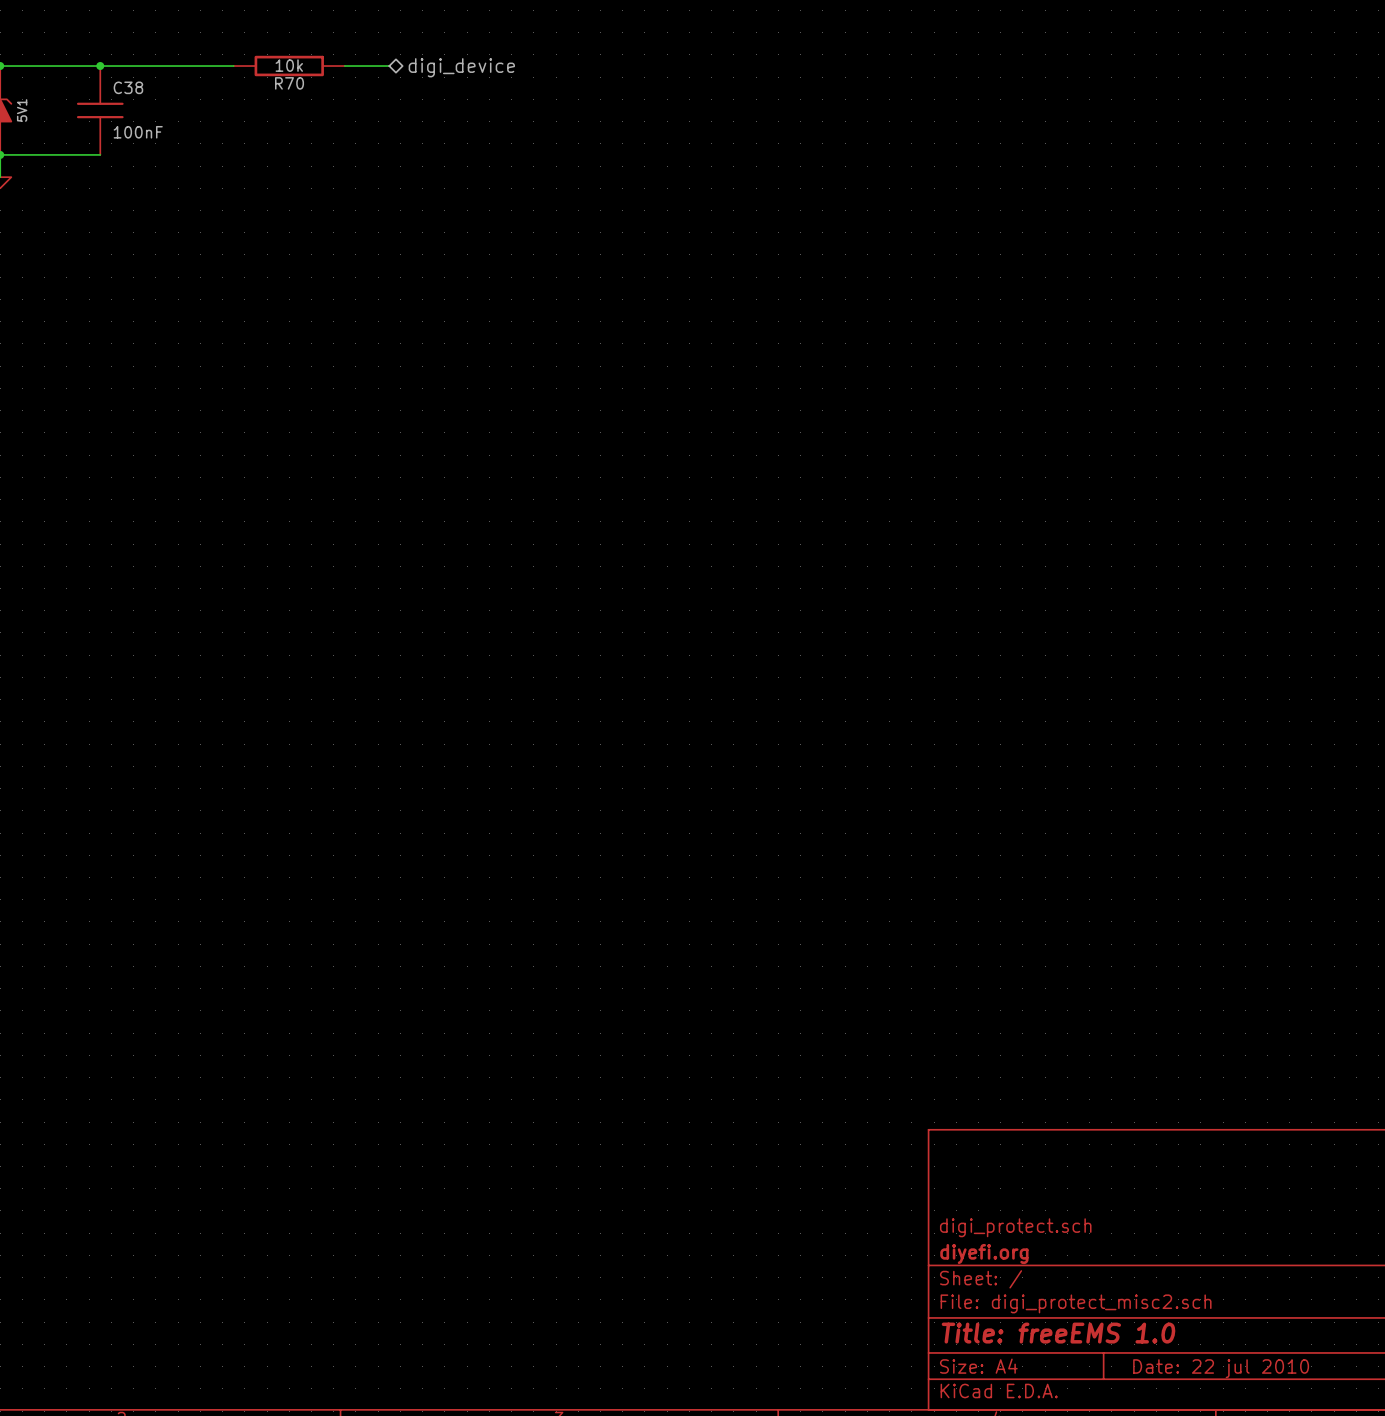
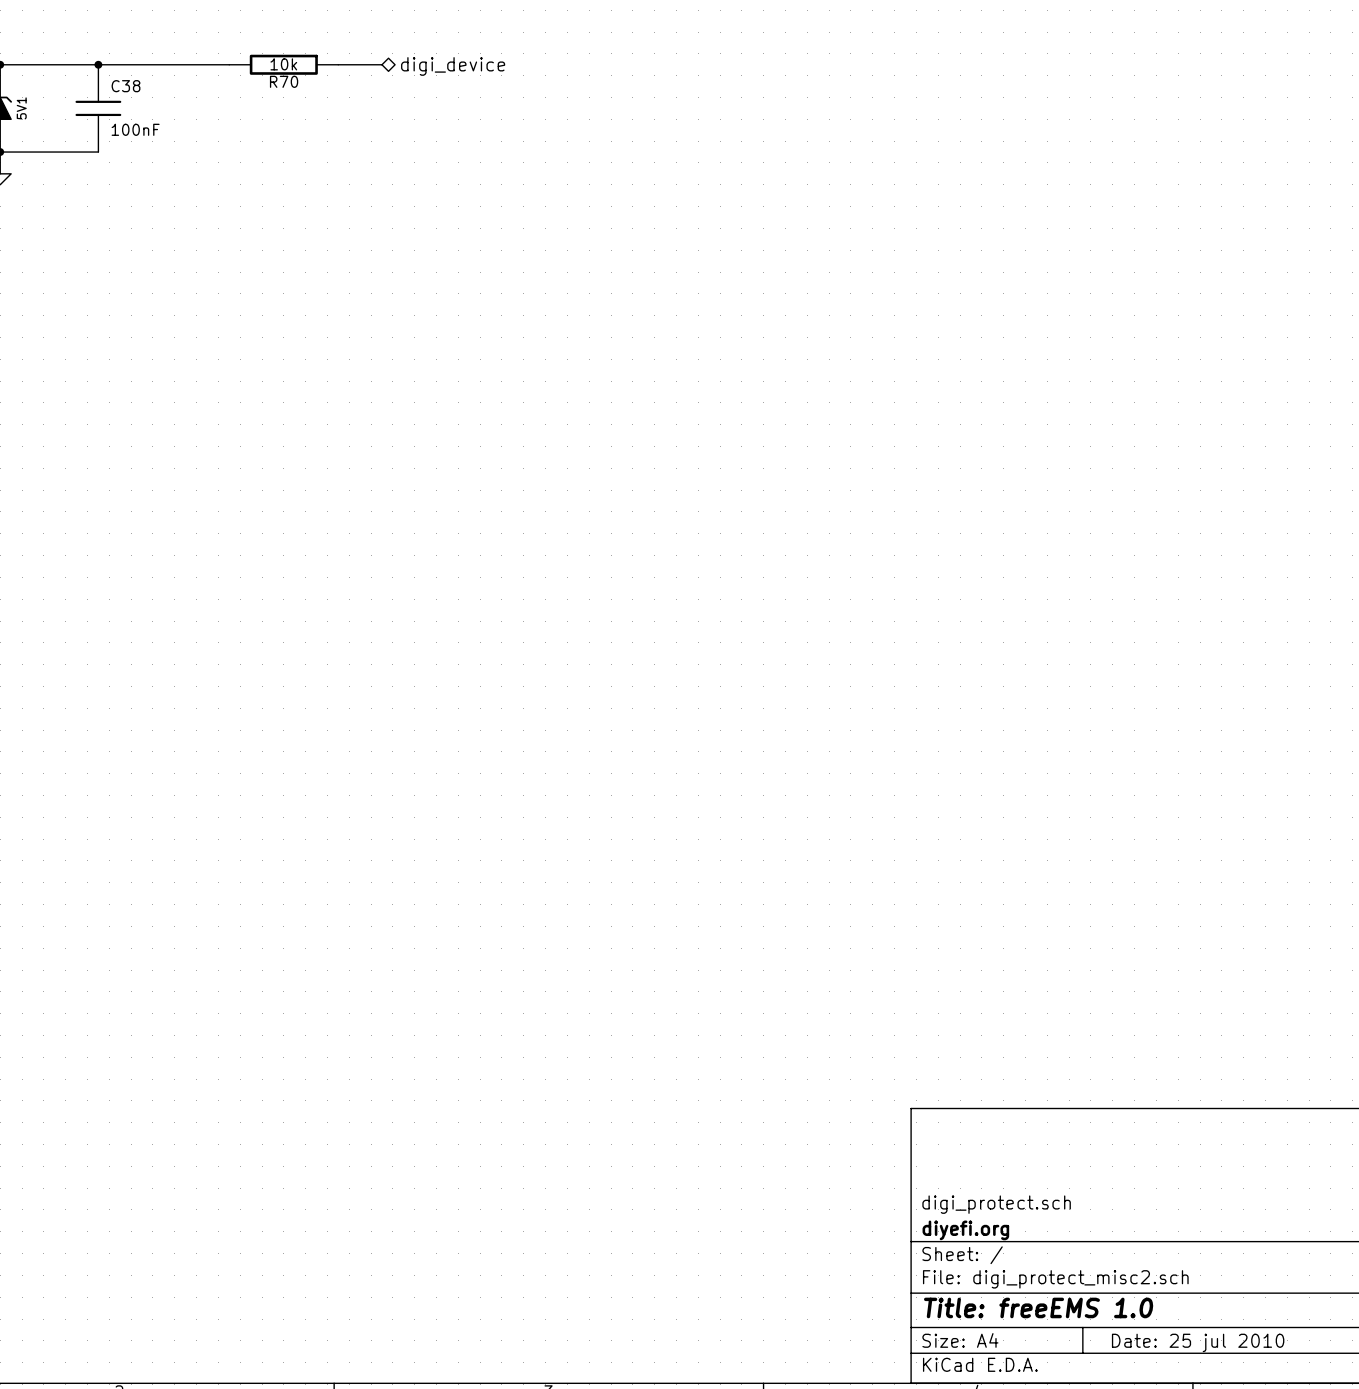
title block: Date: 22 jul 2010 (1221, 1368) -> Date: 25 jul 2010 (1198, 1342)

